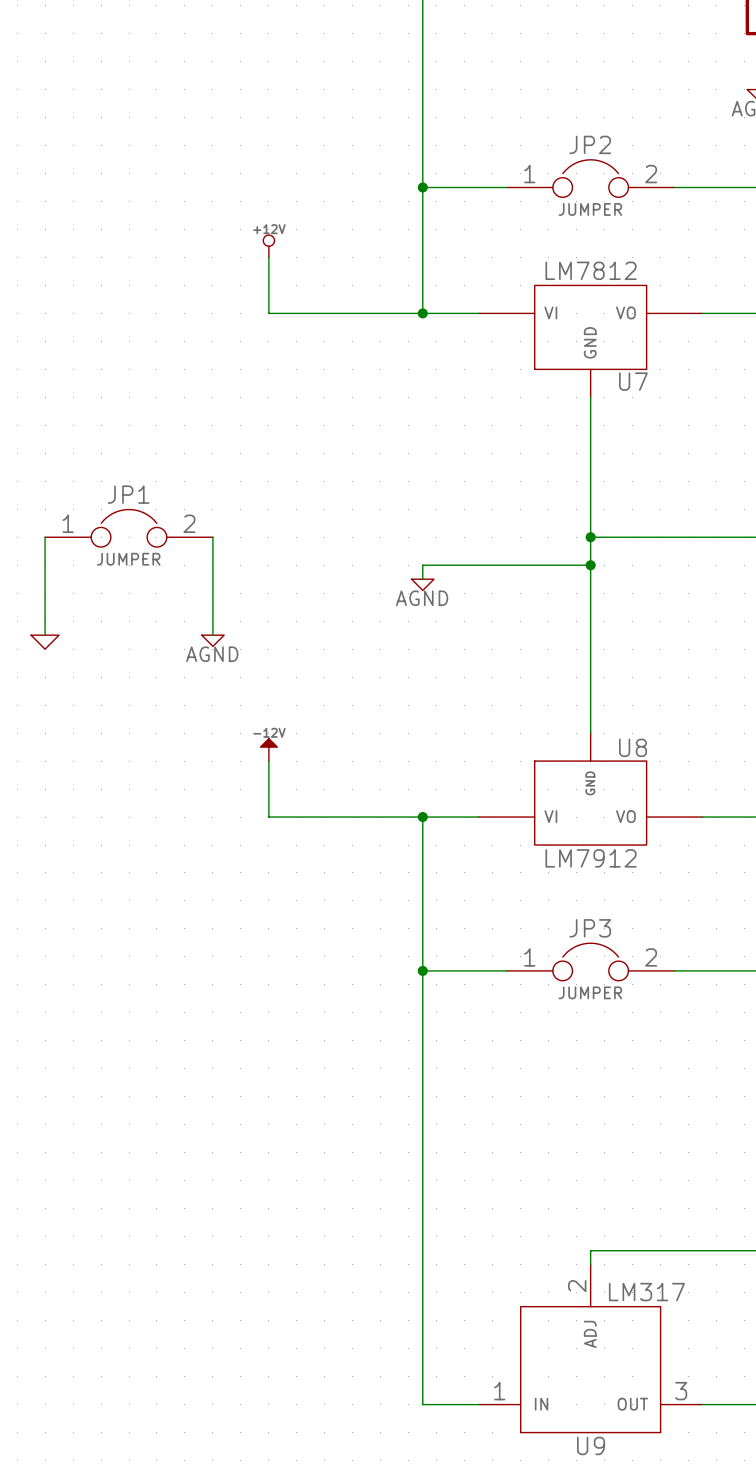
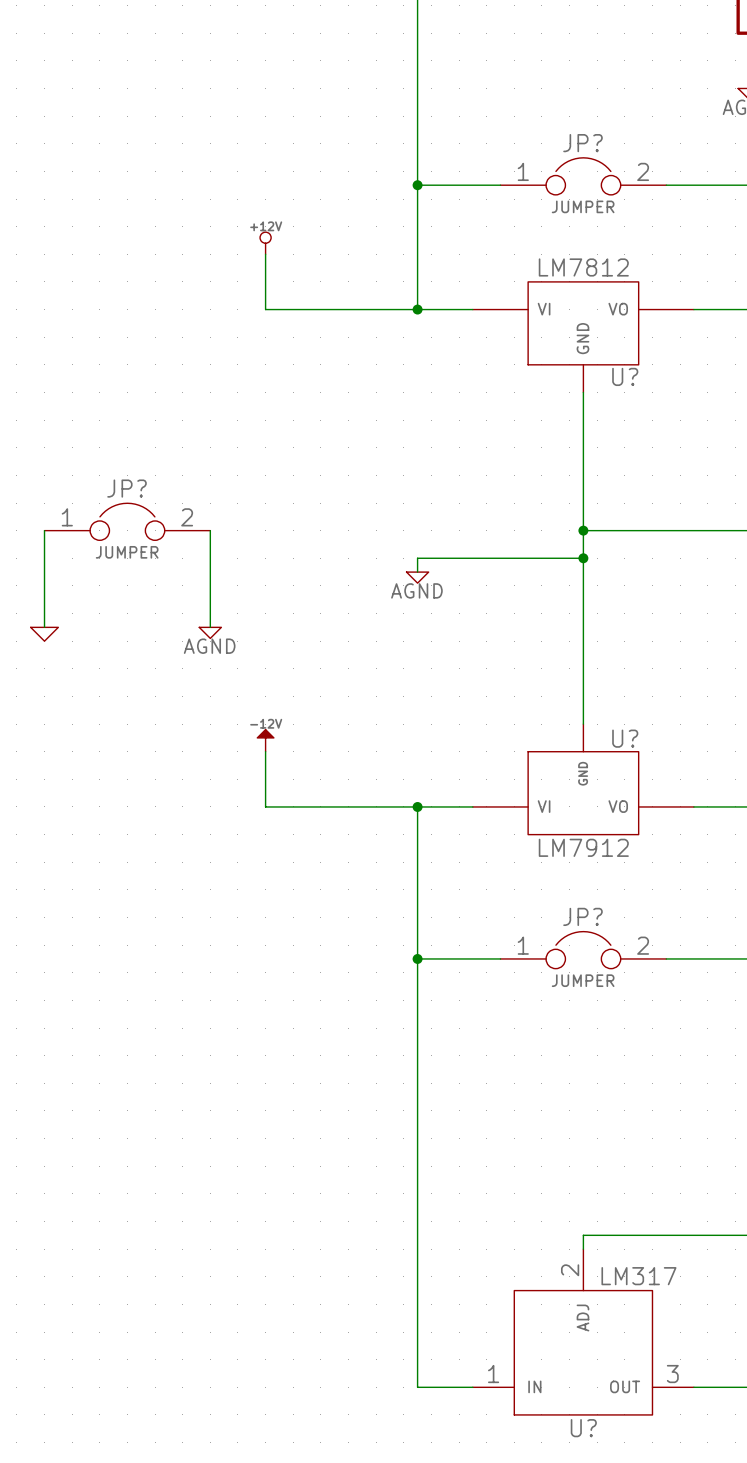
JP2 name: JP2 (590, 144) -> JP? (583, 143)
U7 name: U7 (633, 381) -> U? (625, 376)
JP1 name: JP1 (128, 494) -> JP? (127, 488)
U8 name: U8 (633, 747) -> U? (625, 738)
JP3 name: JP3 (590, 928) -> JP? (583, 916)
U9 name: U9 (591, 1445) -> U? (583, 1428)

